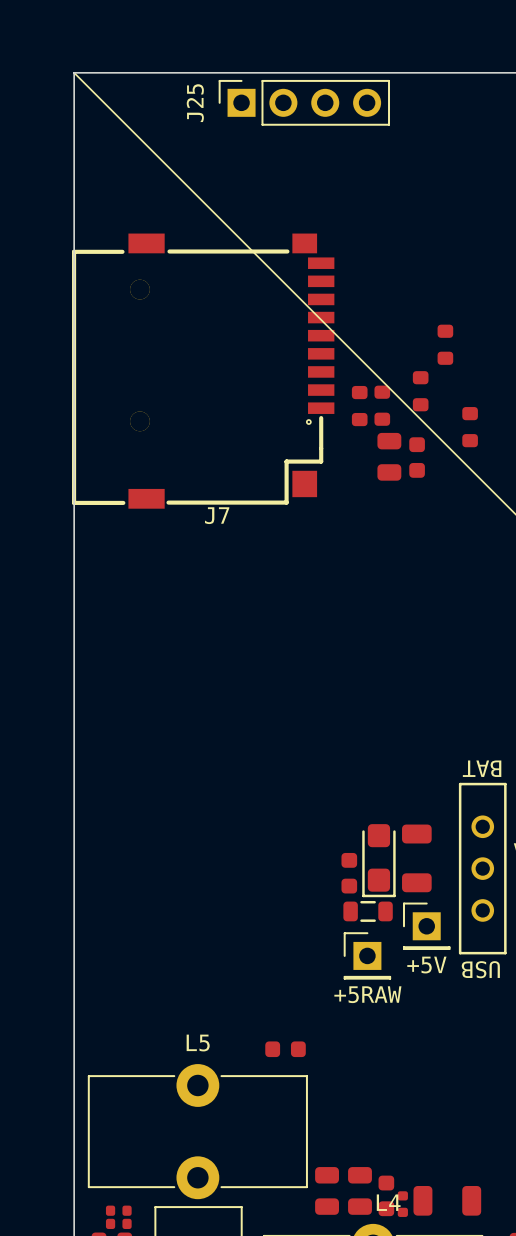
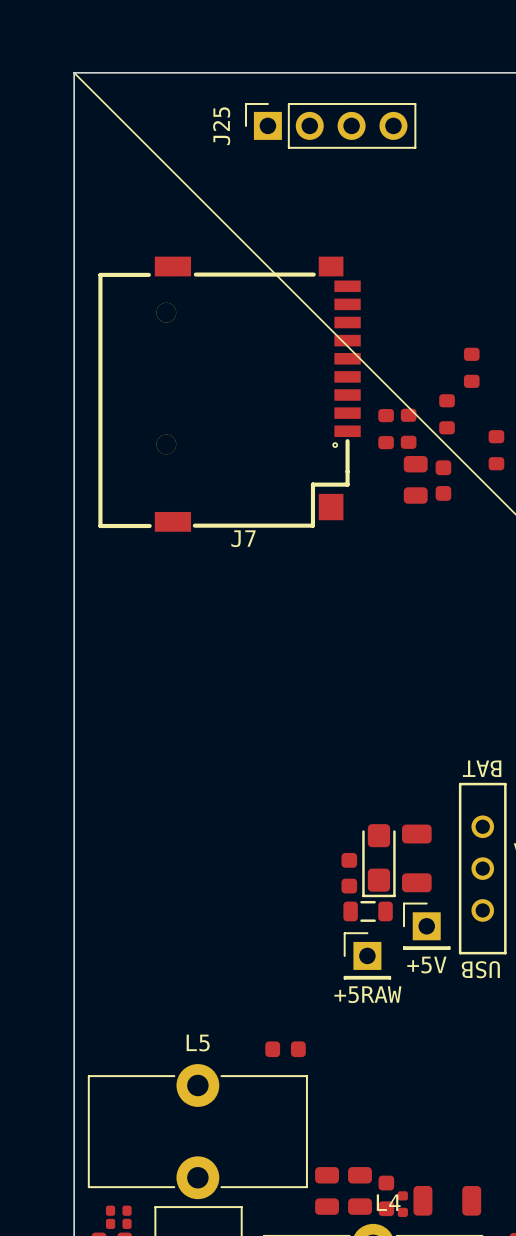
J25 position: (304, 102) -> (330, 125)
part: (445, 344) -> none
part: none -> (471, 367)
J7 position: (203, 371) -> (229, 394)
part: (420, 391) -> none
part: (382, 405) -> none
part: (359, 406) -> none
part: none -> (447, 414)
part: (470, 427) -> none
part: none -> (408, 428)
part: none -> (386, 429)
part: none -> (496, 450)
part position: (389, 456) -> (415, 479)
part position: (417, 457) -> (443, 480)

